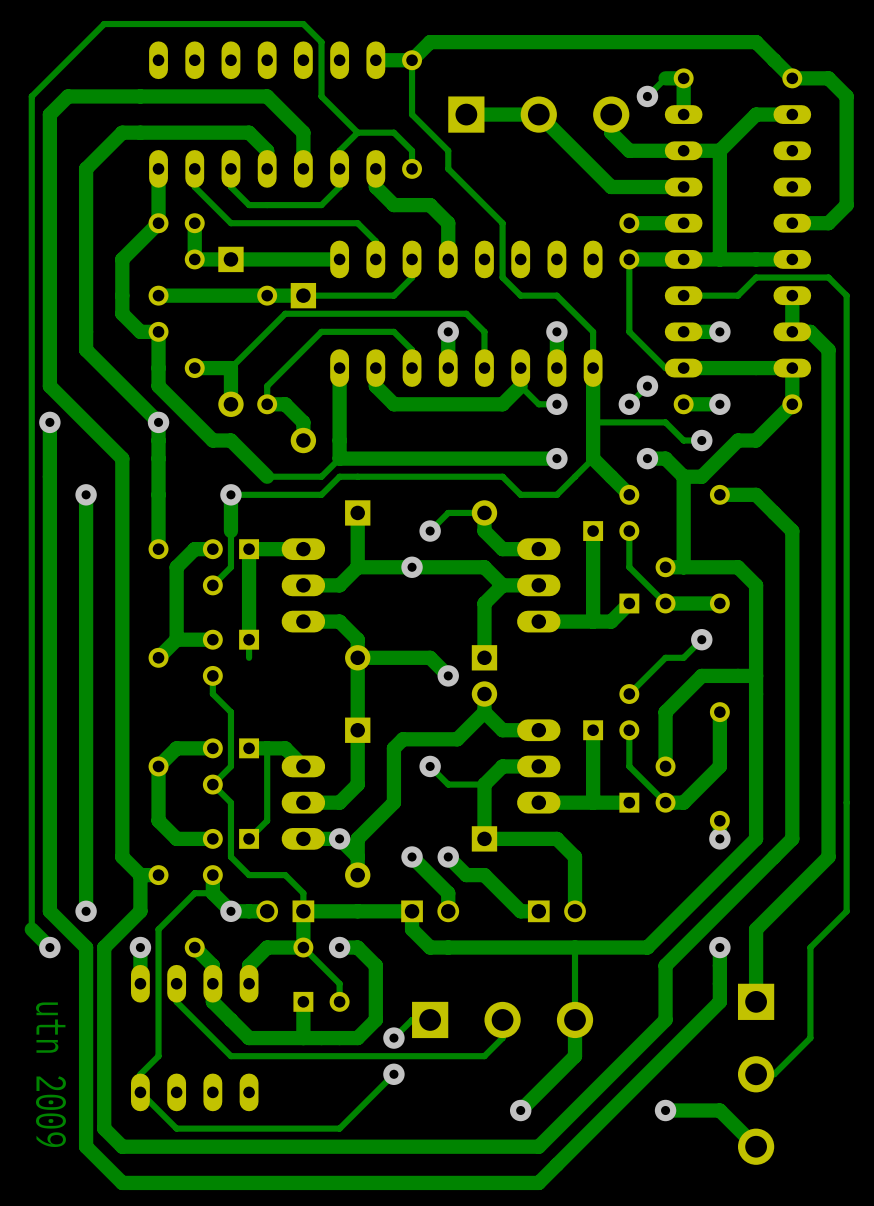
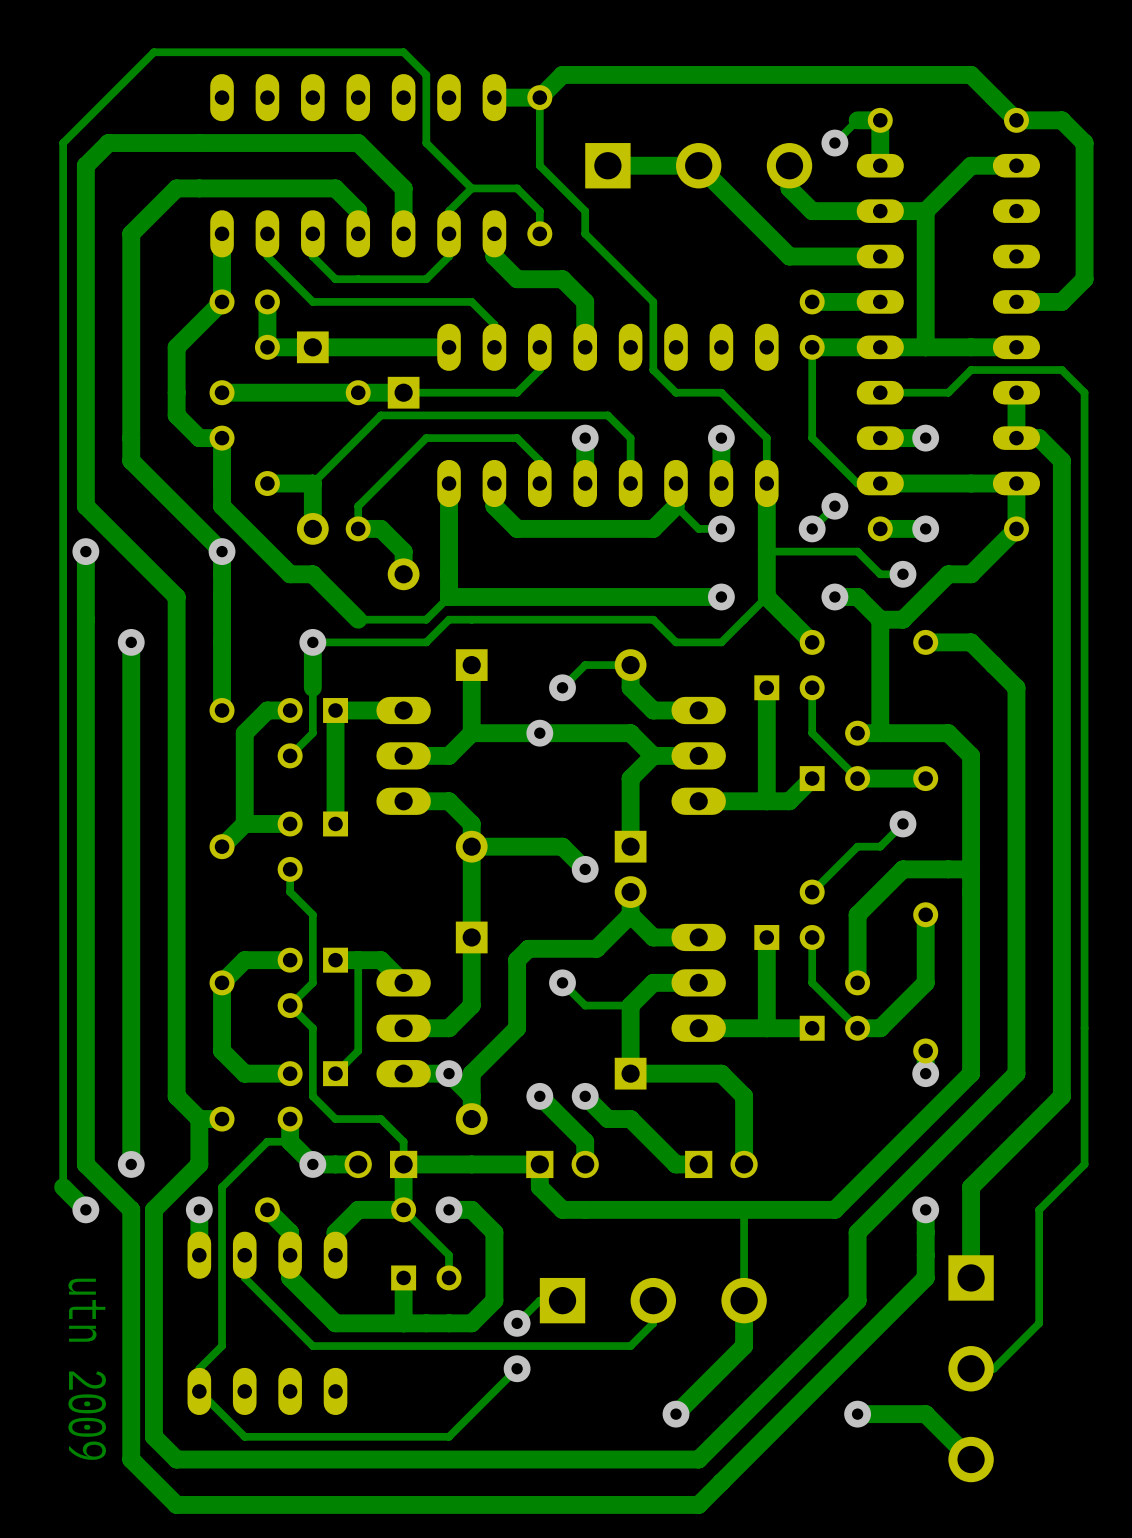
track: (249, 639) (249, 657) -> none

